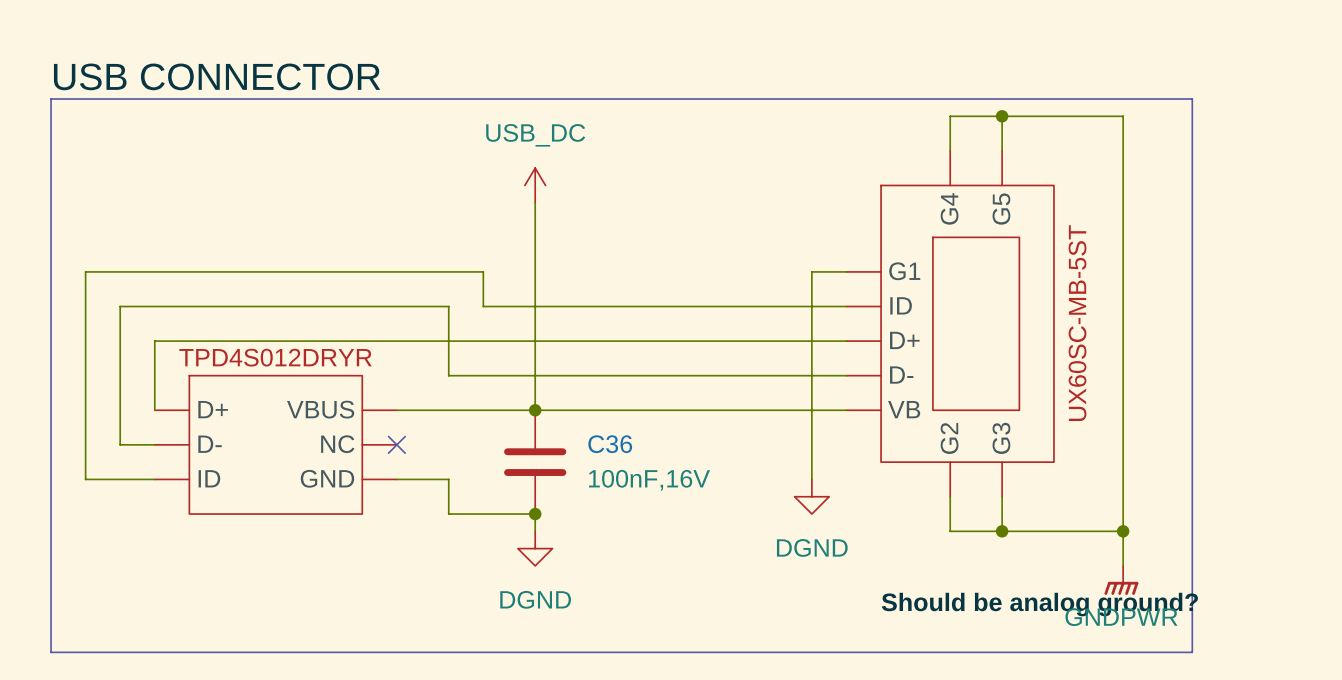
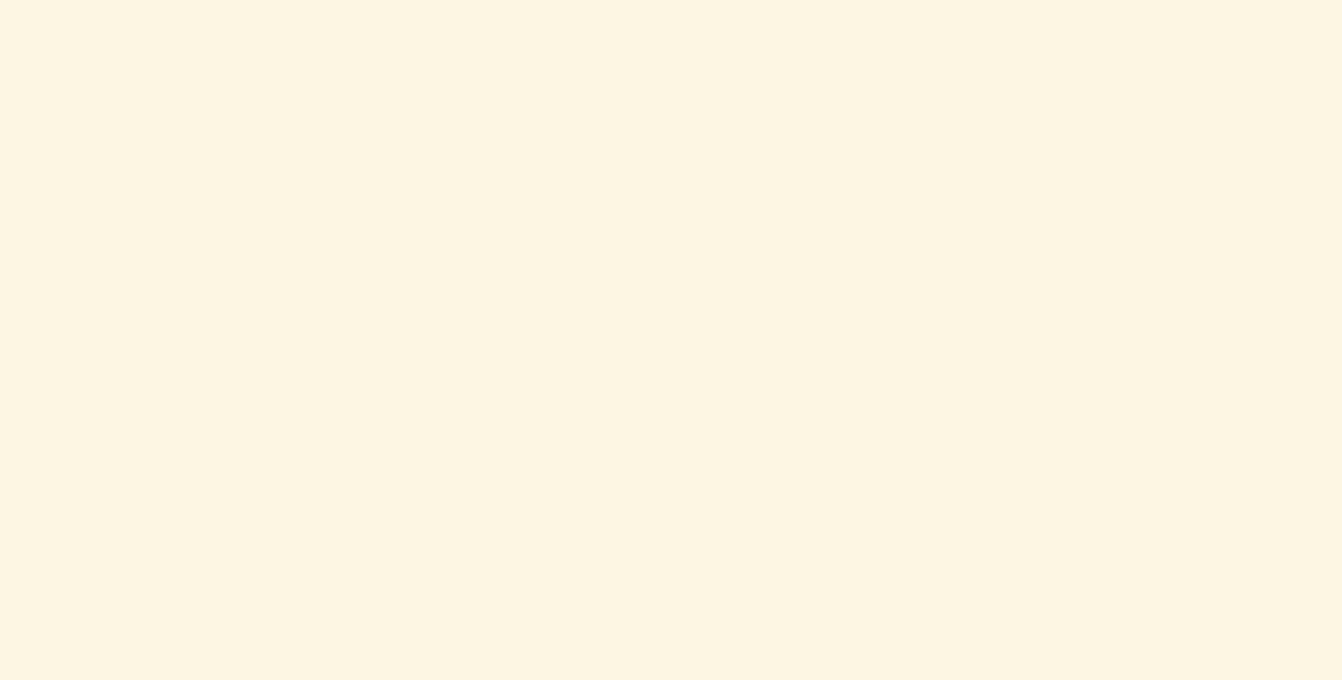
label: USB CONNECTOR (217, 76) -> none
line: (51, 99) (1192, 99) (1192, 652) (51, 652) (51, 99) -> none
wire: (1002, 116) (1002, 150) -> none
junction: (1002, 116) -> none
wire: (950, 150) (950, 116) (1123, 116) (1123, 565) -> none
power symbol: USB_DC (535, 185) -> none
wire: (535, 202) (535, 410) -> none
wire: (846, 271) (811, 271) (811, 479) -> none
wire: (846, 306) (483, 306) (483, 271) (85, 271) (85, 479) (154, 479) -> none
part: (950, 323) -> none
wire: (846, 341) (154, 341) (154, 410) -> none
wire: (846, 375) (448, 375) (448, 306) (120, 306) (120, 444) (154, 444) -> none
wire: (396, 410) (846, 410) -> none
junction: (535, 410) -> none
part: (275, 444) -> none
no-connect mark: (396, 444) -> none
C36: 100nF,16V (535, 462) -> none
wire: (396, 479) (448, 479) (448, 514) (535, 514) (535, 531) -> none
power symbol: DGND (811, 496) -> none
wire: (950, 496) (950, 531) (1123, 531) -> none
wire: (1002, 496) (1002, 531) -> none
junction: (535, 514) -> none
junction: (1002, 531) -> none
junction: (1123, 531) -> none
power symbol: DGND (535, 548) -> none
power symbol: GNDPWR (1121, 580) -> none
label: Should be analog ground? (1039, 604) -> none

